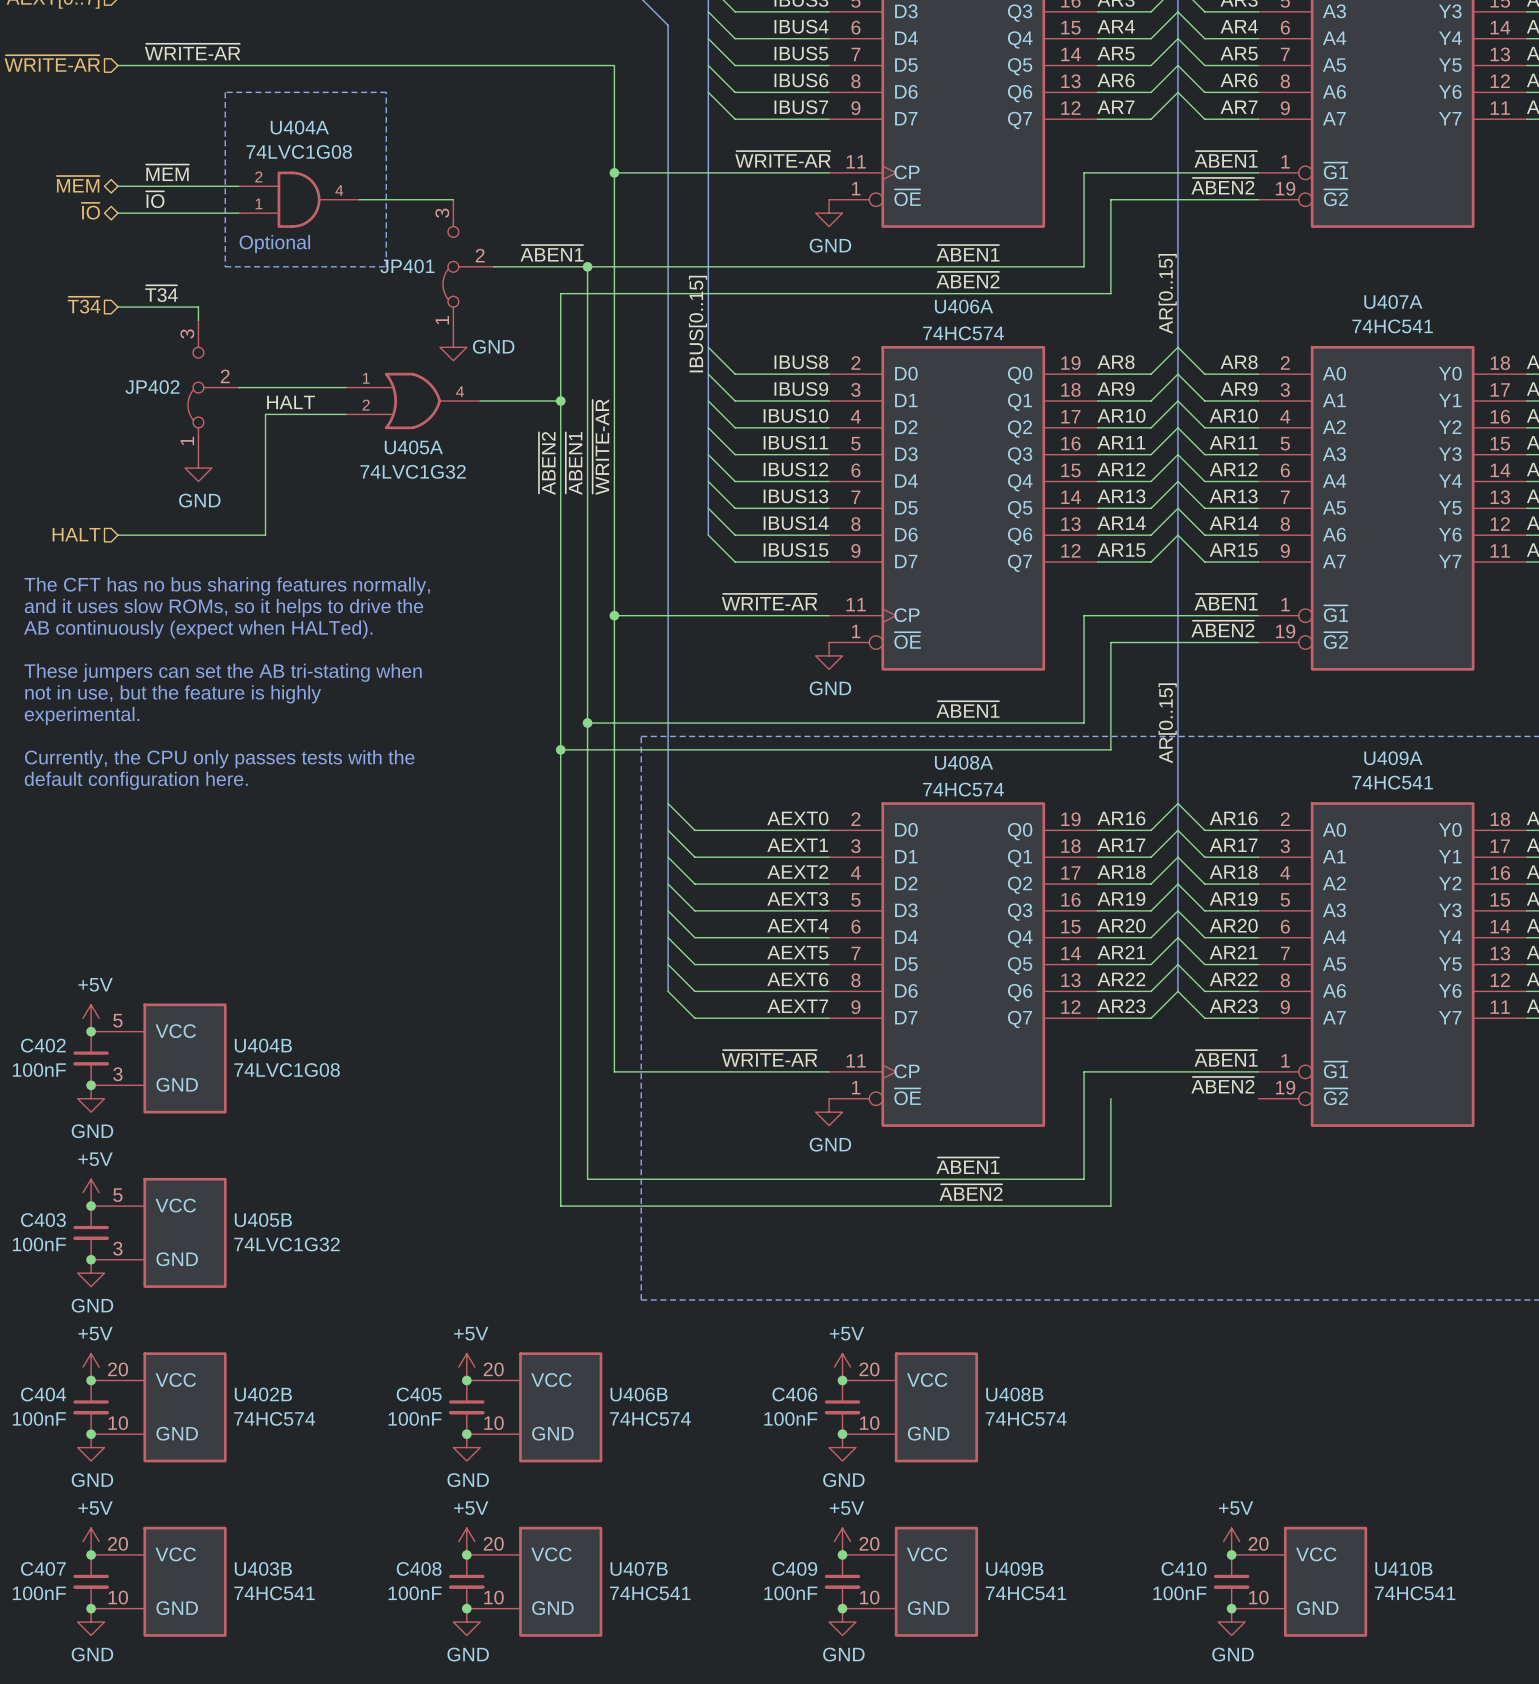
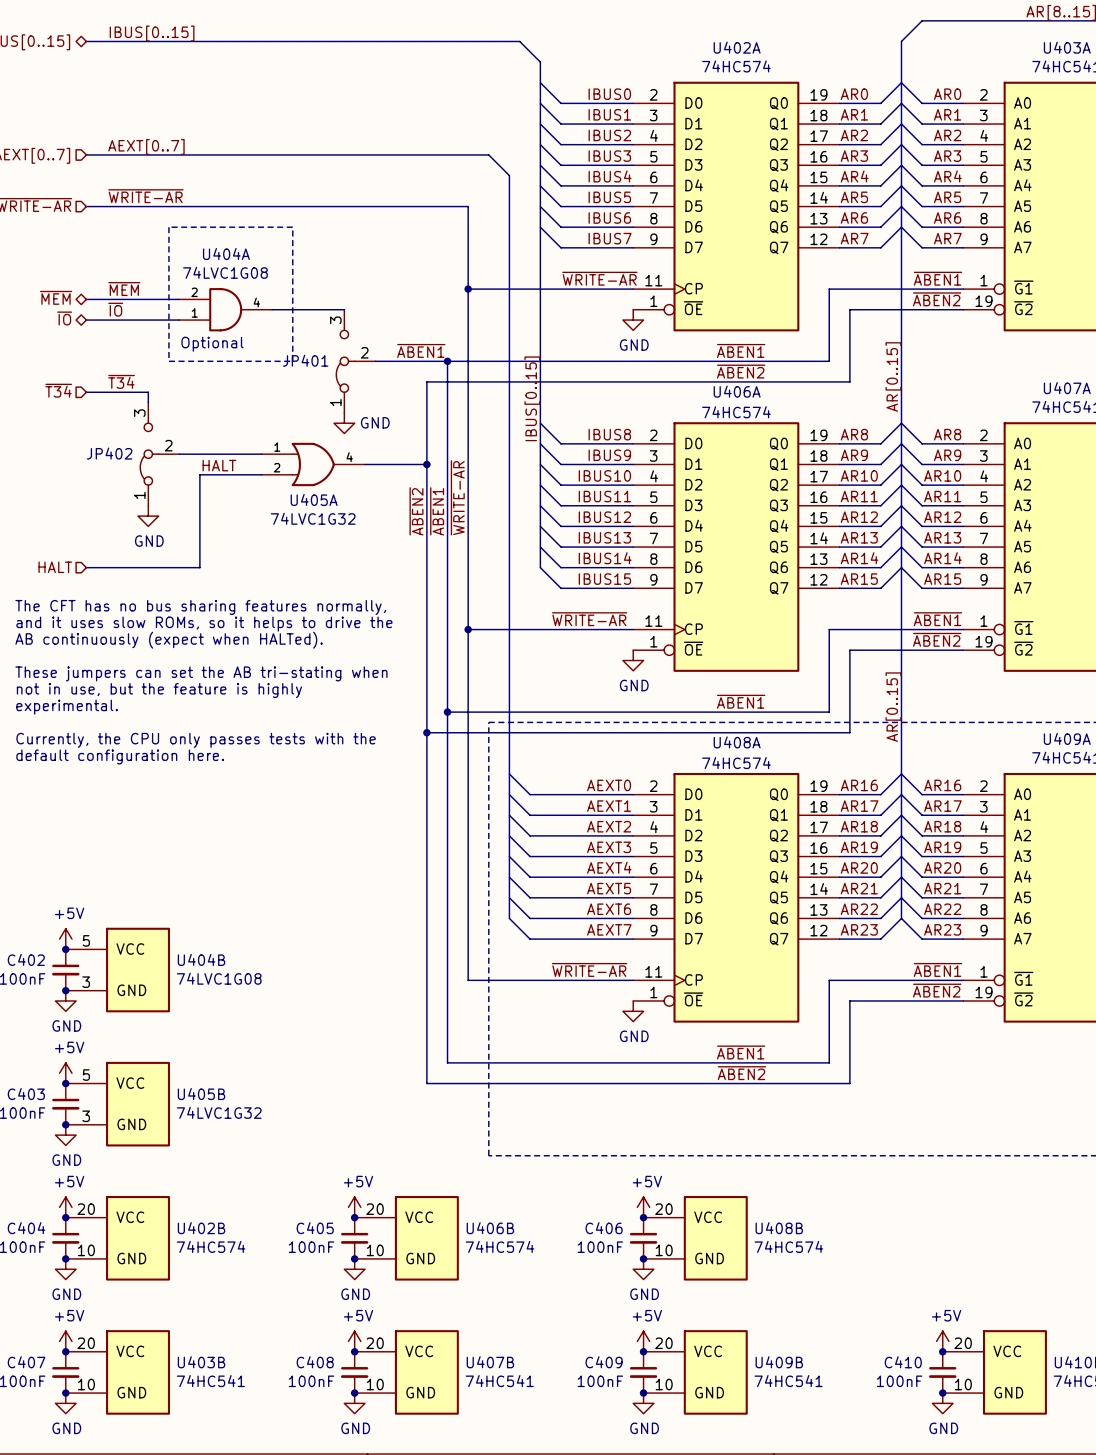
wire: none -> (849, 1000) (963, 1000)

